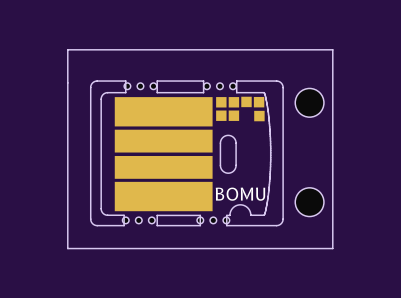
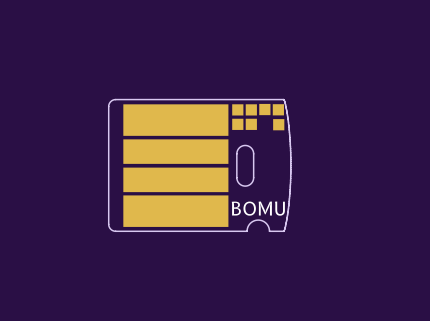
board edge: (67, 49) (332, 49) (332, 248) (67, 248) (67, 49) -> none
part: (140, 86) -> none
part: (219, 86) -> none
board edge: (125, 92) (125, 81) (96, 81) (90, 86) (90, 220) (96, 225) (124, 225) (124, 215) -> (247, 231) (133, 231)
board edge: (157, 92) (157, 81) (203, 81) (203, 92) -> (168, 99) (135, 99)
board edge: (236, 92) (236, 81) (277, 81) (282, 85) (283, 219) (277, 225) (226, 225) (226, 215) (229, 215) -> (254, 99) (218, 99)
part: (309, 102) -> none
part: (309, 202) -> none
board edge: (157, 215) (157, 225) (200, 225) (200, 215) (157, 215) -> none
part: (138, 220) -> none
part: (213, 220) -> none

